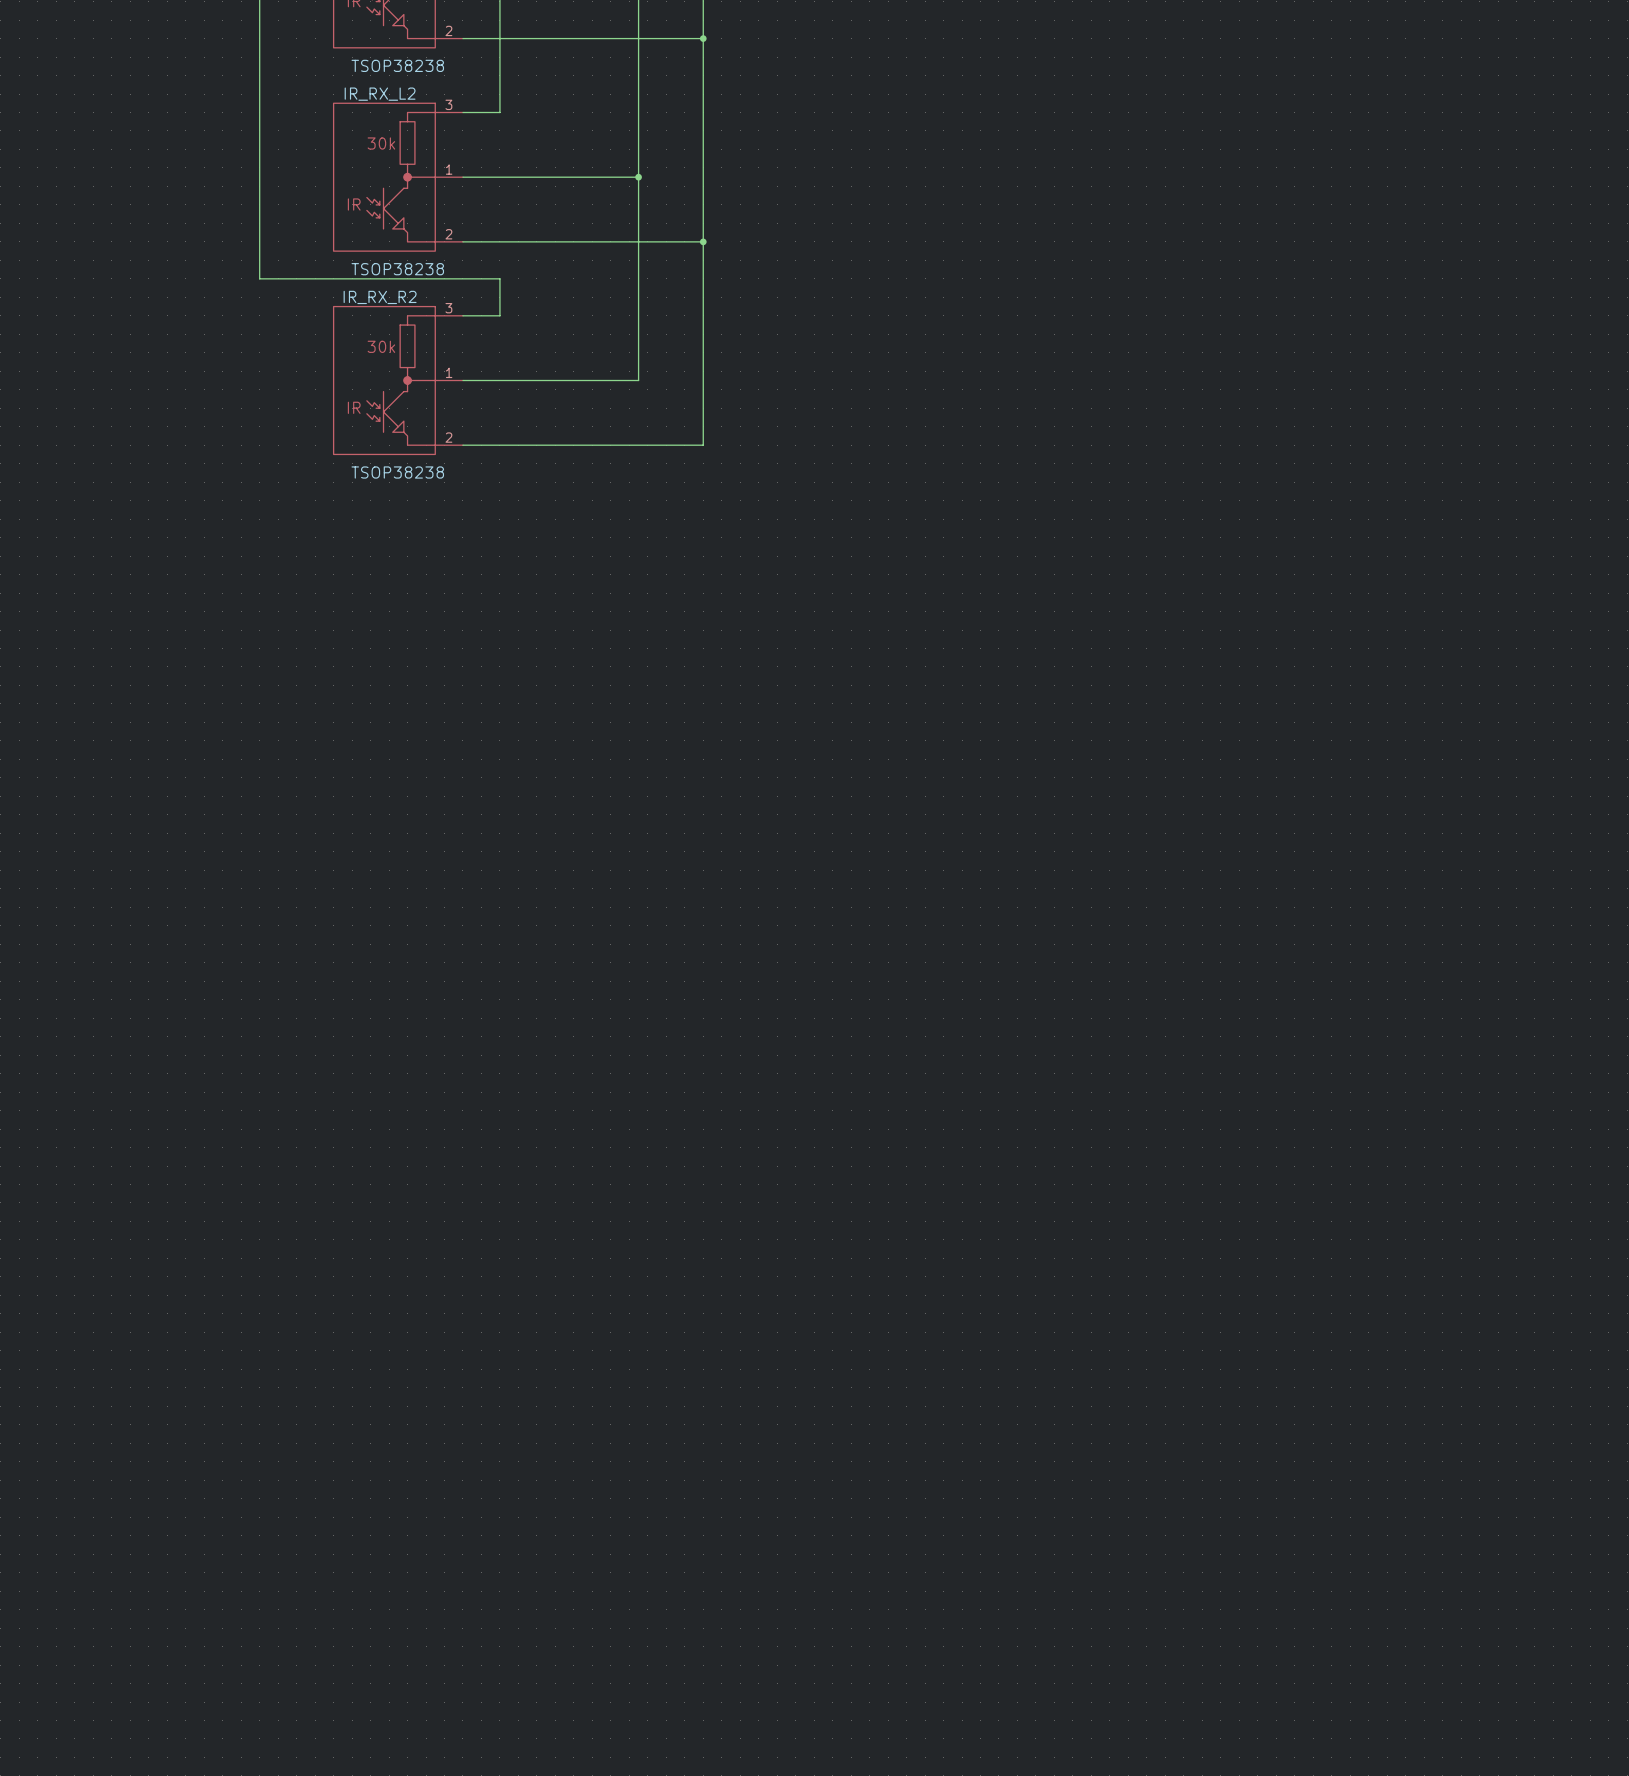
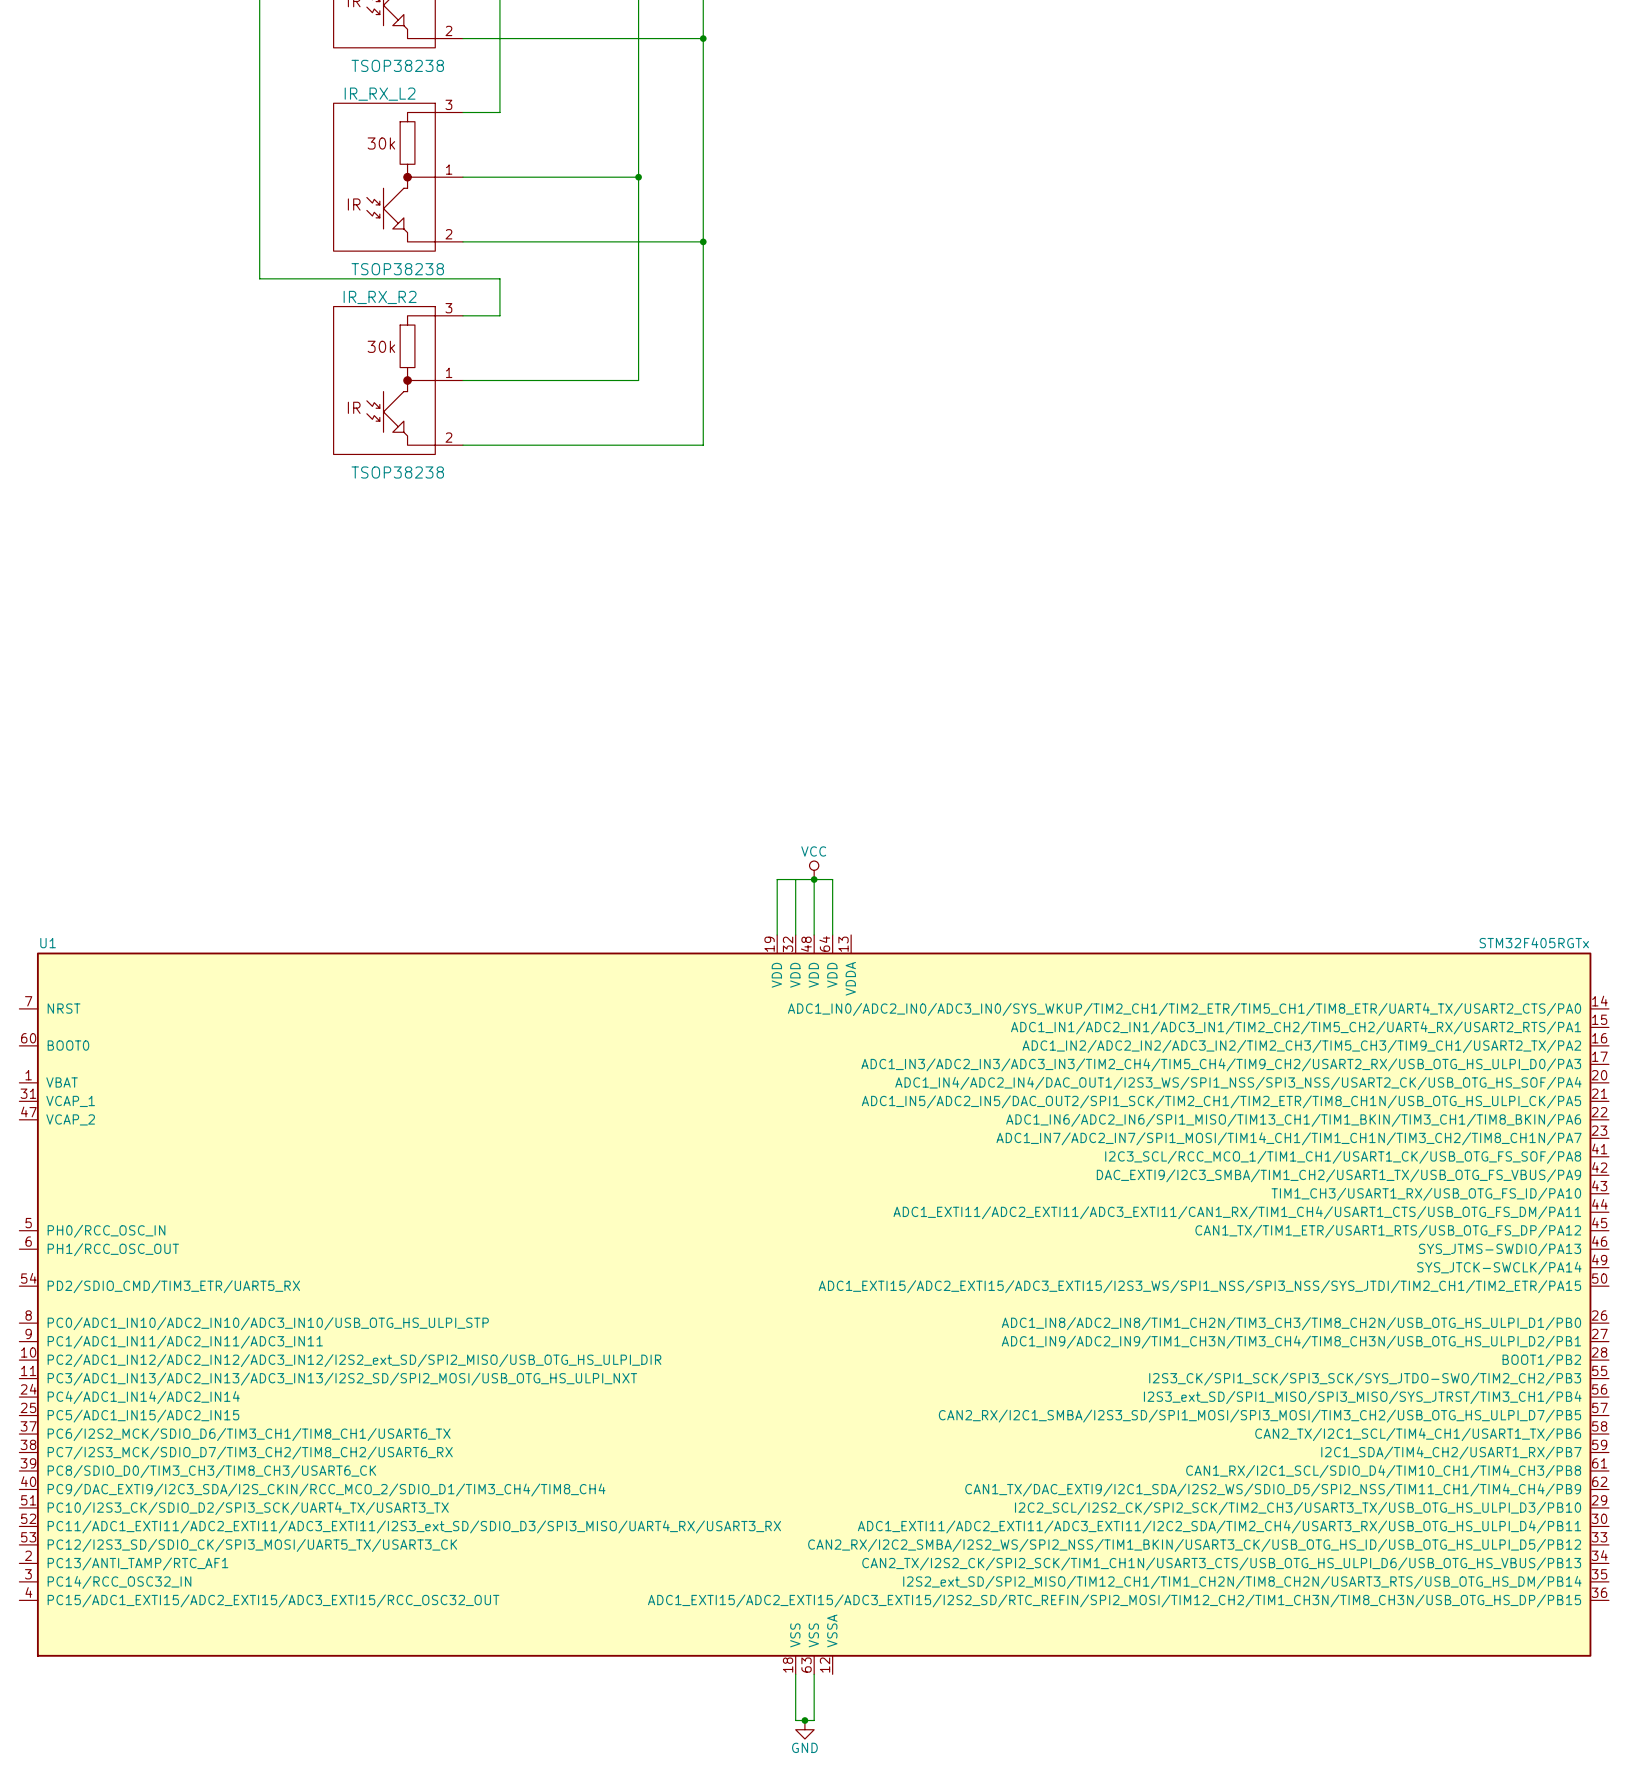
power symbol: none -> VCC (814, 870)
wire: none -> (795, 879) (795, 934)
wire: none -> (814, 879) (814, 934)
junction: none -> (814, 879)
wire: none -> (777, 934) (777, 879) (832, 879) (832, 934)
U1: none -> STM32F405RGTx (814, 1304)
wire: none -> (795, 1674) (795, 1720) (814, 1720) (814, 1674)
junction: none -> (804, 1720)
power symbol: none -> GND (804, 1729)

